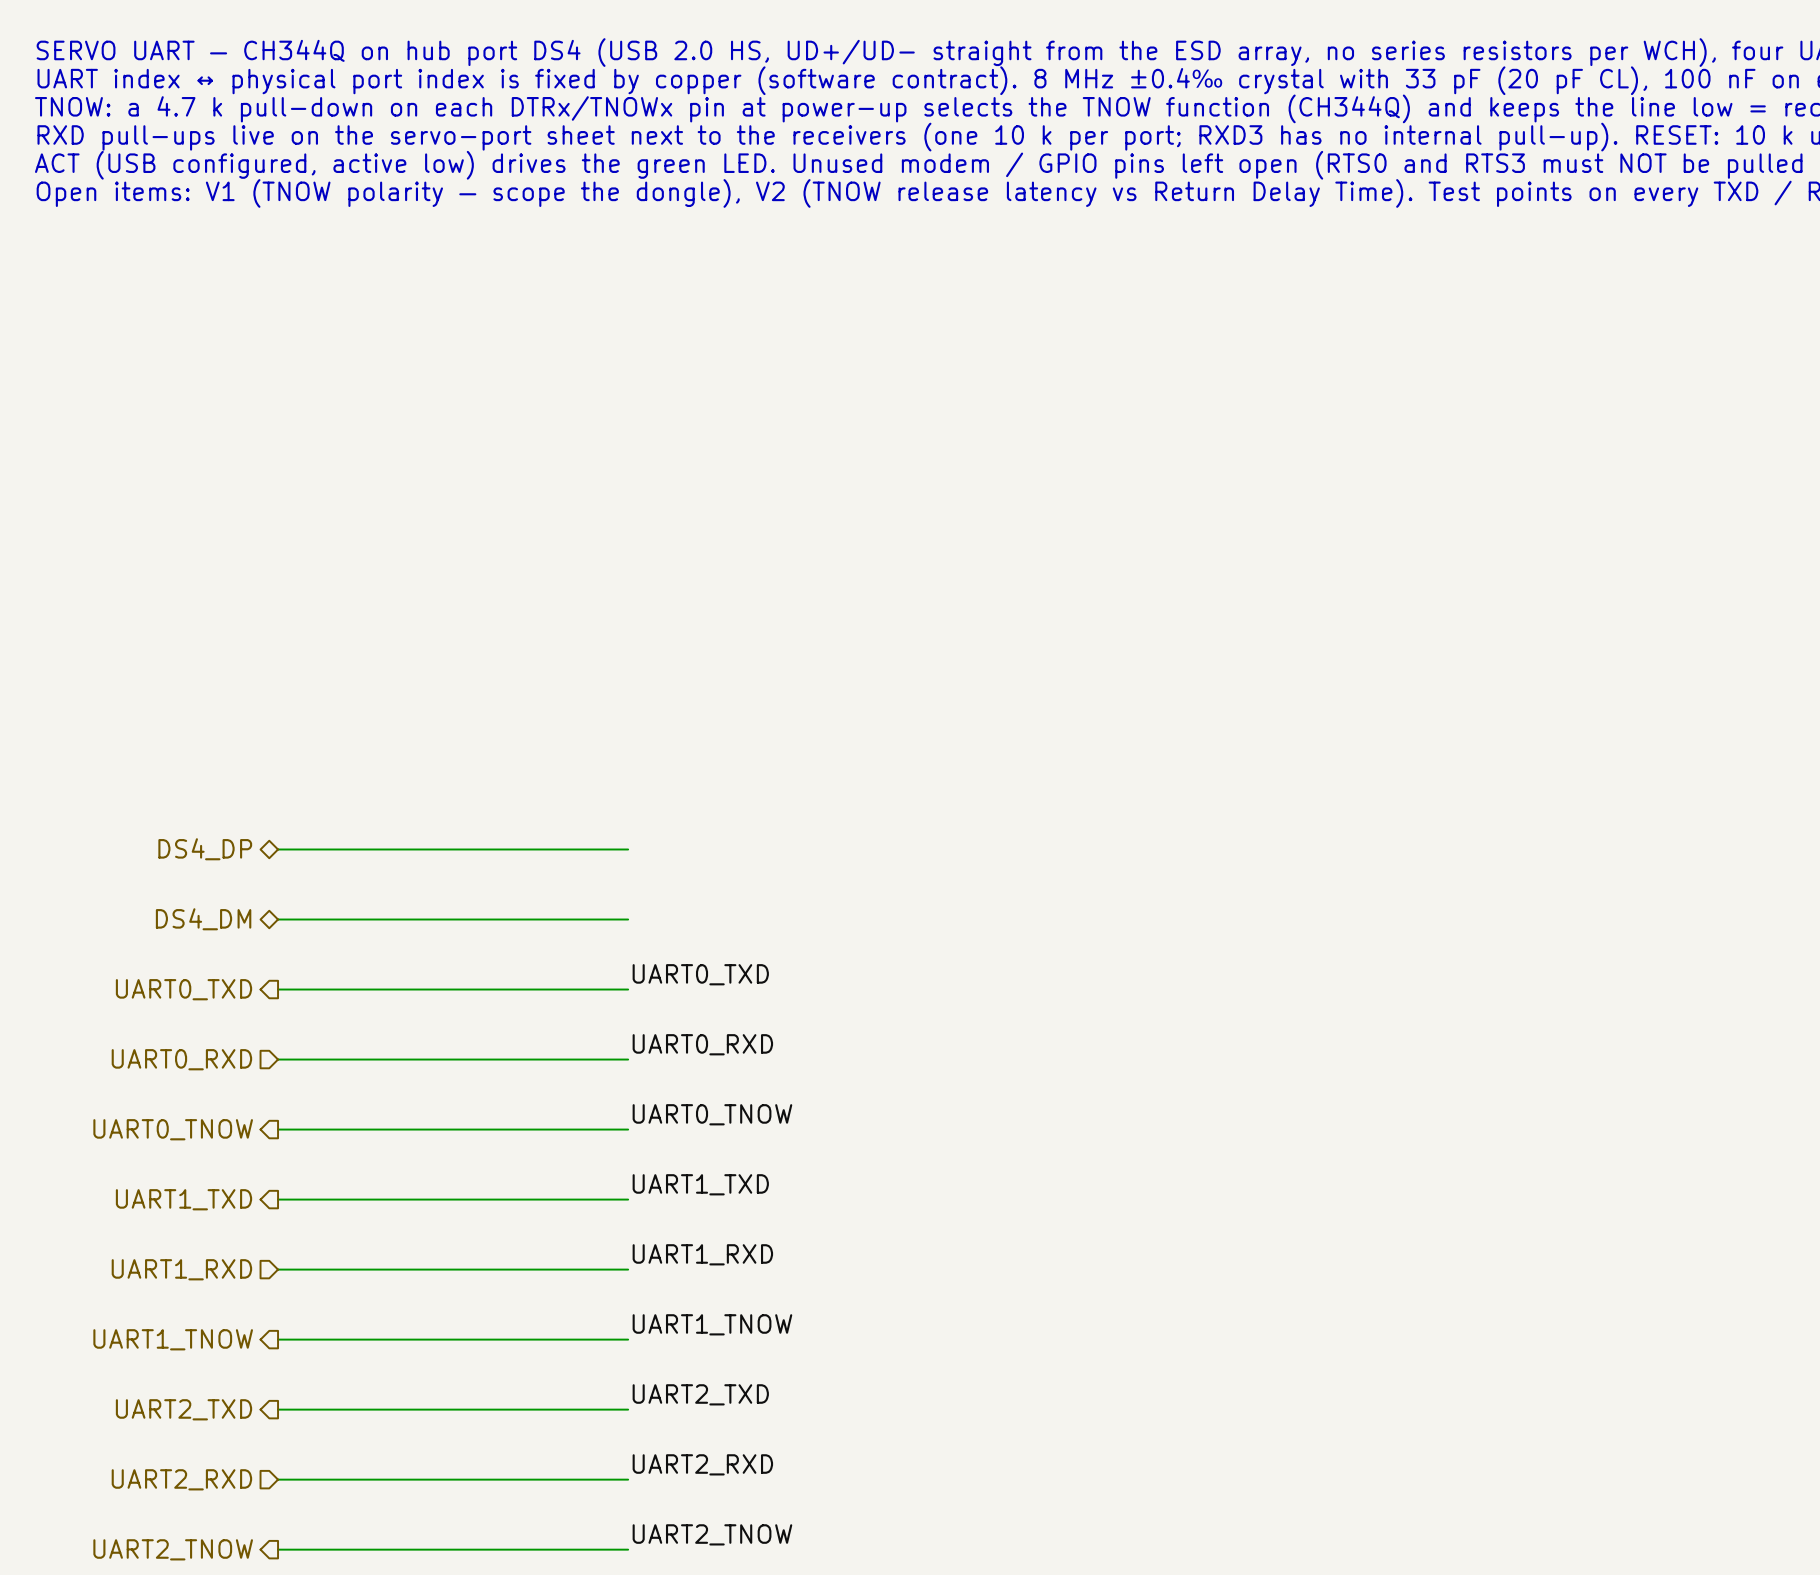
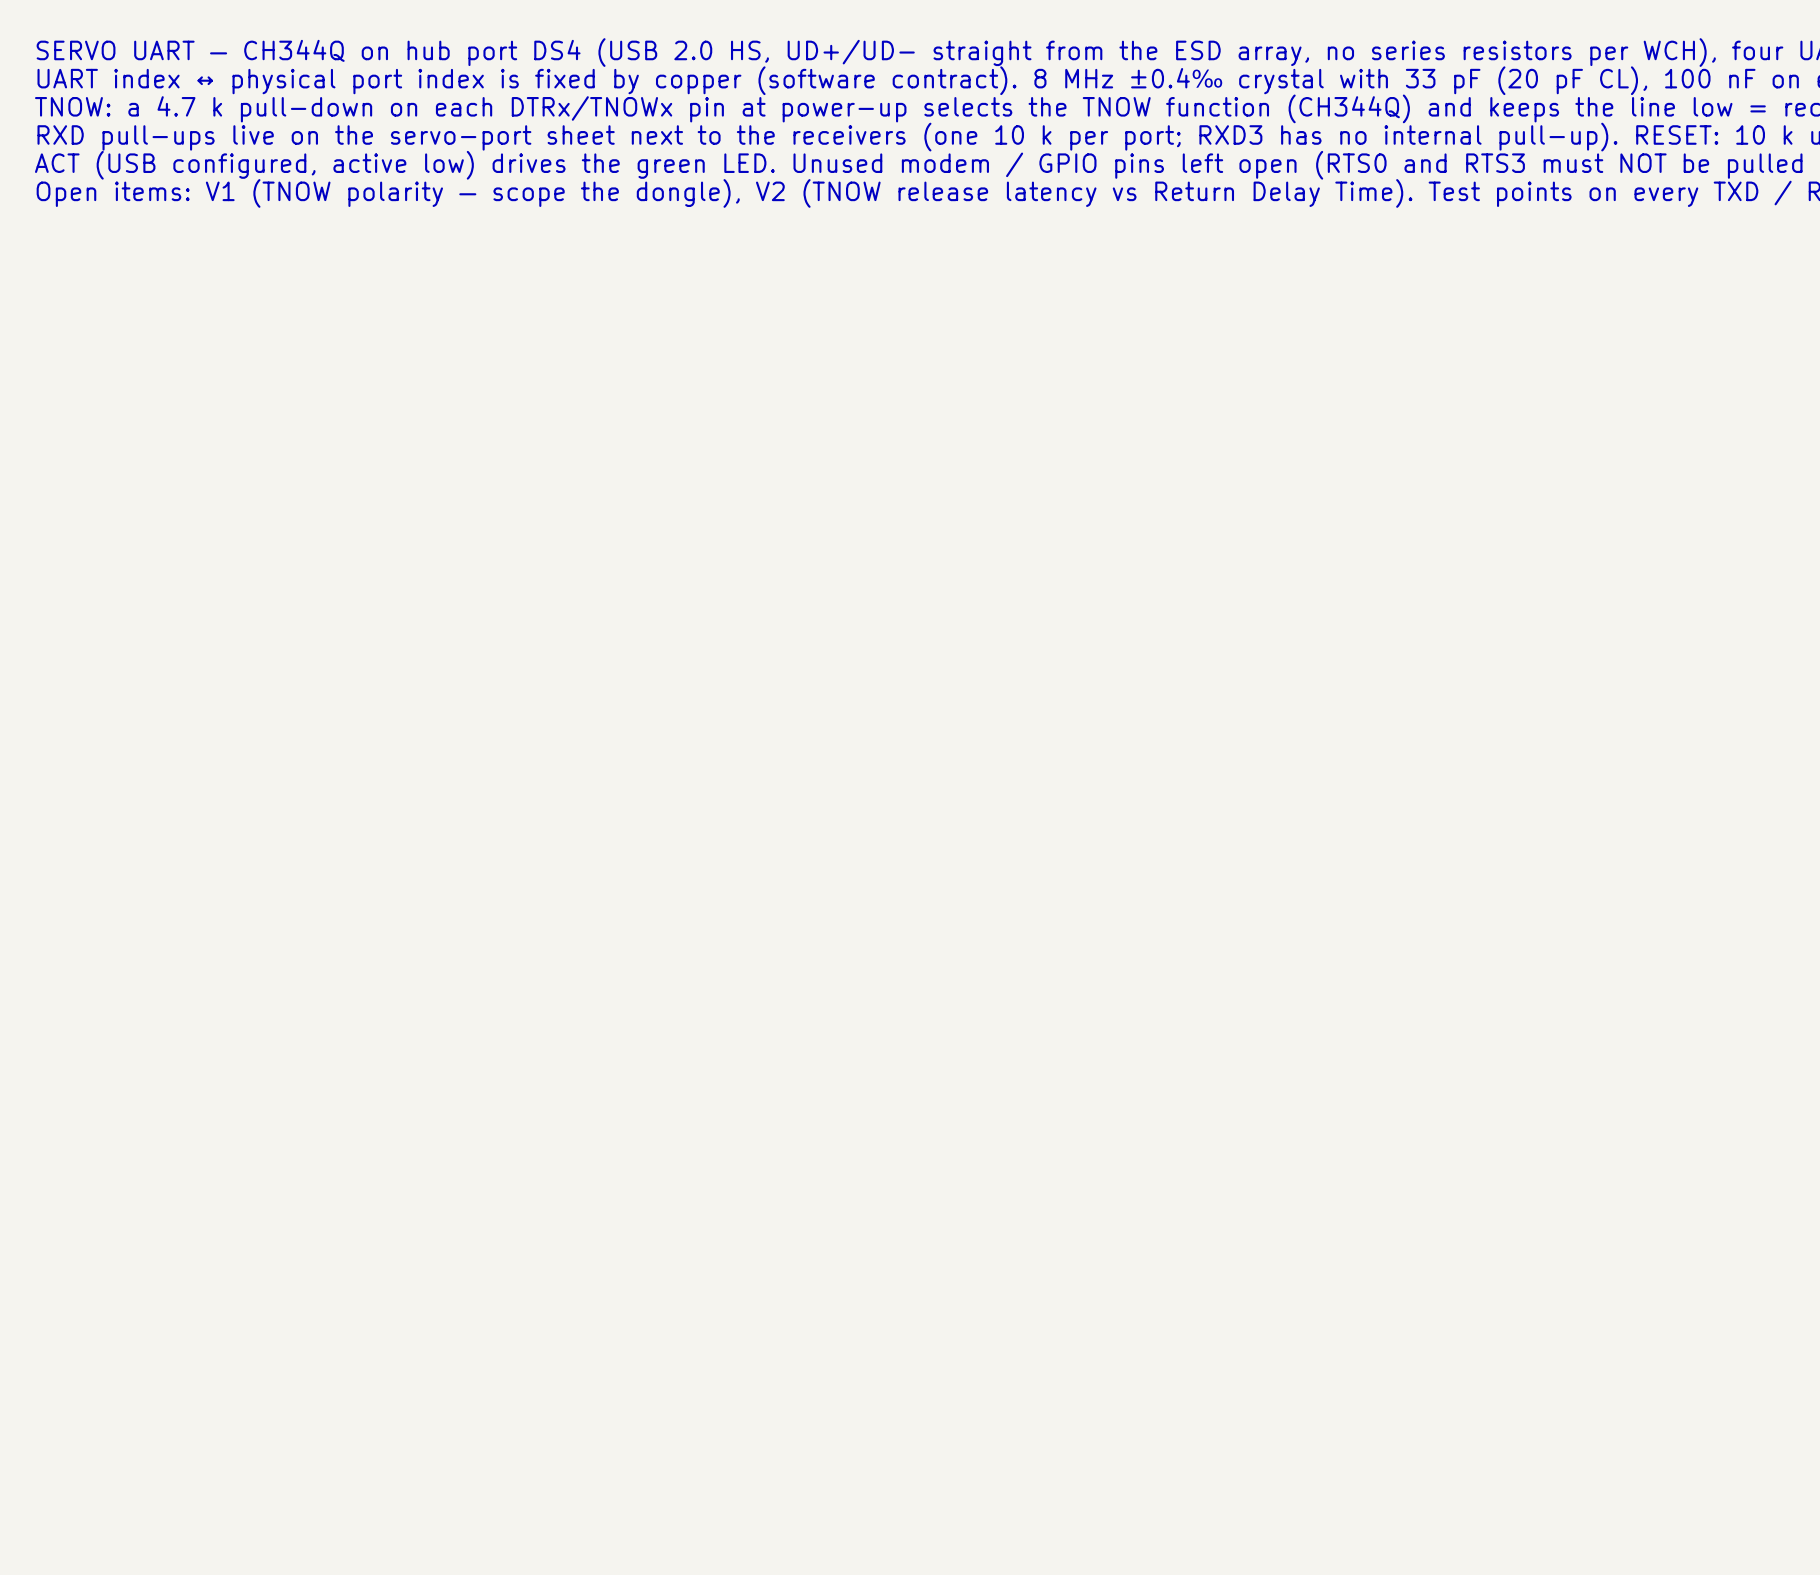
hierarchical label: DS4_DP (205, 849) -> none
wire: (278, 849) (628, 849) -> none
hierarchical label: DS4_DM (203, 919) -> none
wire: (278, 919) (628, 919) -> none
label: UART0_TXD (700, 974) -> none
hierarchical label: UART0_TXD (184, 989) -> none
wire: (278, 989) (628, 989) -> none
label: UART0_RXD (702, 1044) -> none
hierarchical label: UART0_RXD (181, 1059) -> none
wire: (278, 1059) (628, 1059) -> none
label: UART0_TNOW (712, 1114) -> none
hierarchical label: UART0_TNOW (173, 1129) -> none
wire: (278, 1129) (628, 1129) -> none
label: UART1_TXD (700, 1184) -> none
hierarchical label: UART1_TXD (184, 1199) -> none
wire: (278, 1199) (628, 1199) -> none
label: UART1_RXD (702, 1254) -> none
hierarchical label: UART1_RXD (181, 1269) -> none
wire: (278, 1269) (628, 1269) -> none
label: UART1_TNOW (712, 1324) -> none
hierarchical label: UART1_TNOW (173, 1339) -> none
wire: (278, 1339) (628, 1339) -> none
label: UART2_TXD (700, 1394) -> none
hierarchical label: UART2_TXD (184, 1409) -> none
wire: (278, 1409) (628, 1409) -> none
label: UART2_RXD (702, 1464) -> none
hierarchical label: UART2_RXD (181, 1479) -> none
wire: (278, 1479) (628, 1479) -> none
label: UART2_TNOW (712, 1534) -> none
hierarchical label: UART2_TNOW (173, 1549) -> none
wire: (278, 1549) (628, 1549) -> none

